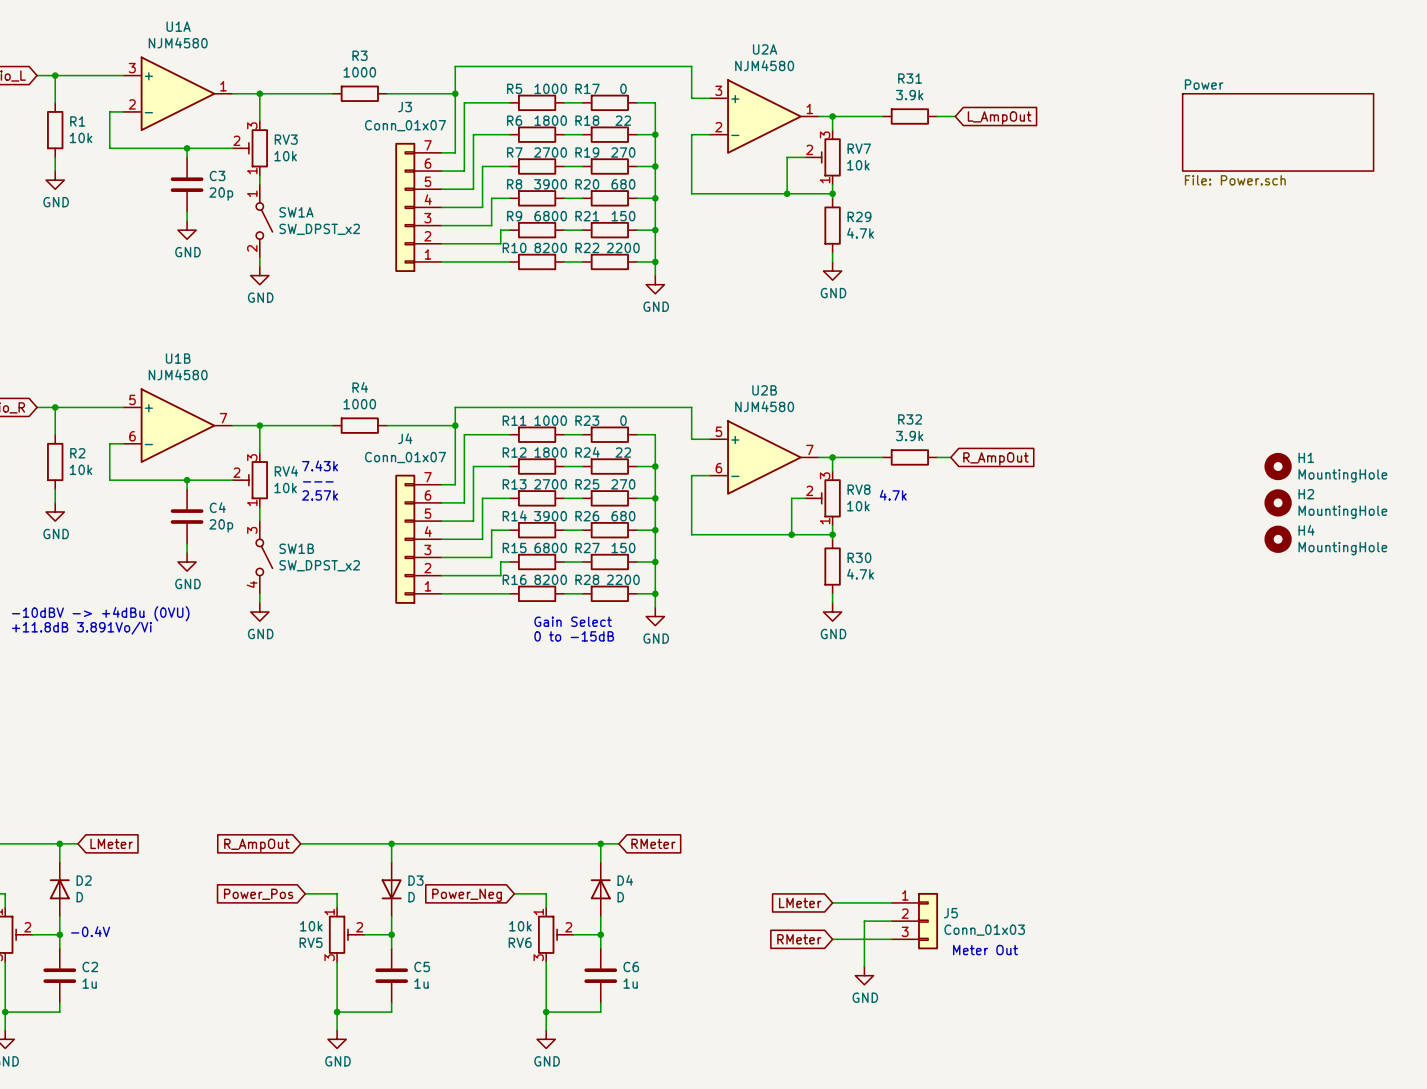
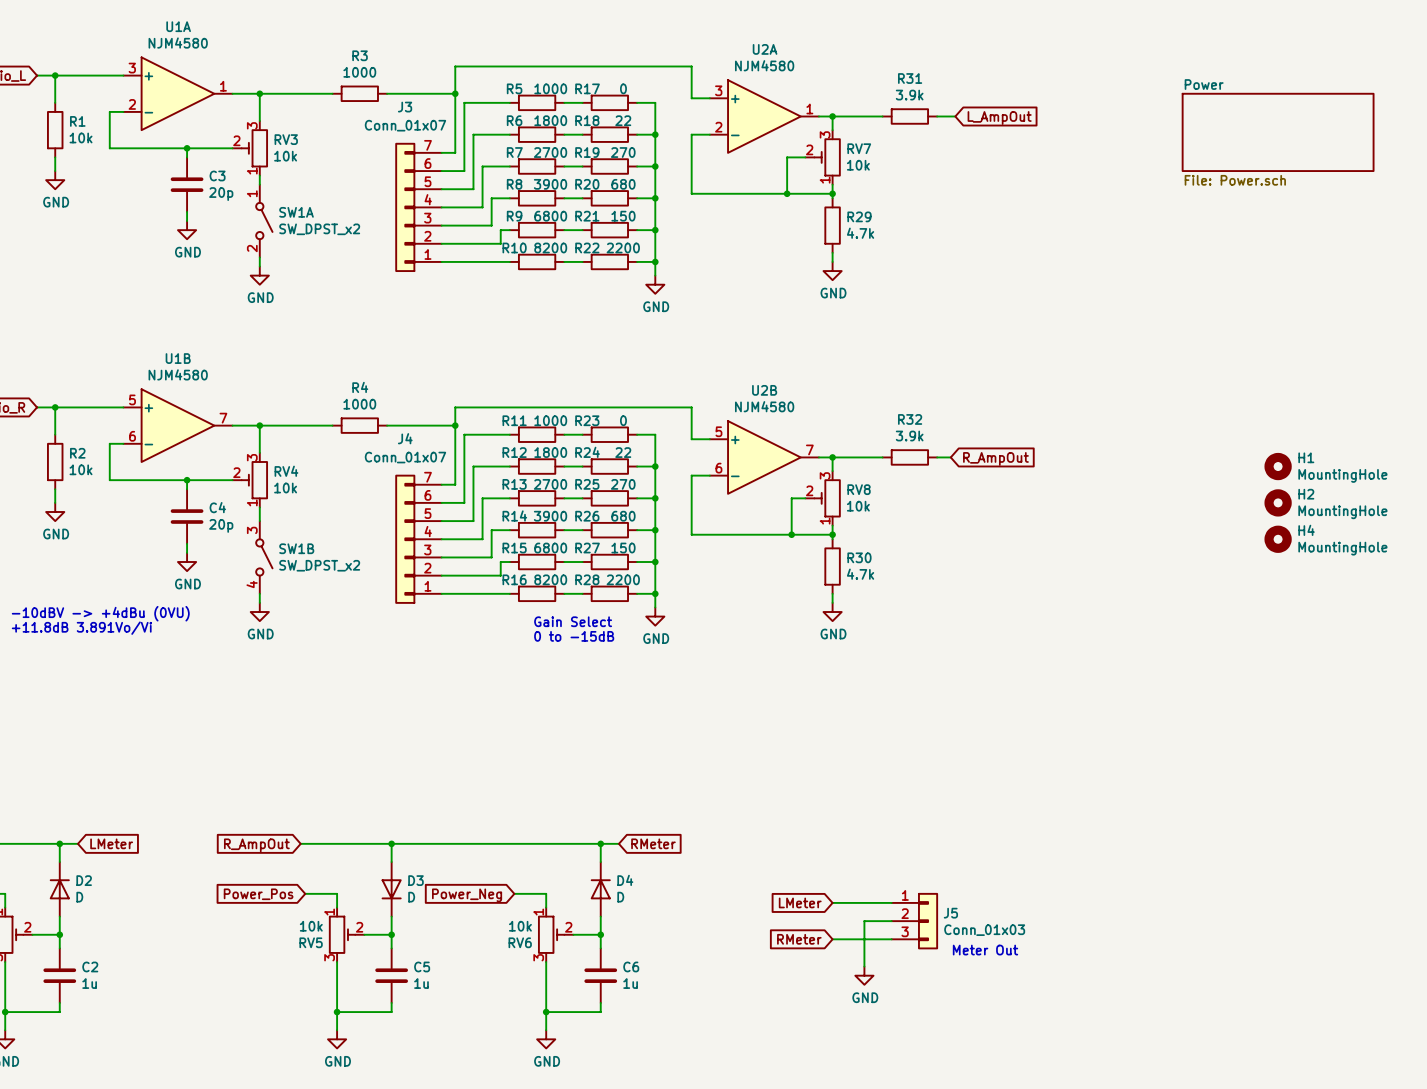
text: 7.43k (320, 465) -> none
text: --- (318, 481) -> none
text: 2.57k (320, 495) -> none
text: 4.7k (893, 495) -> none
text: -0.4V (90, 931) -> none

